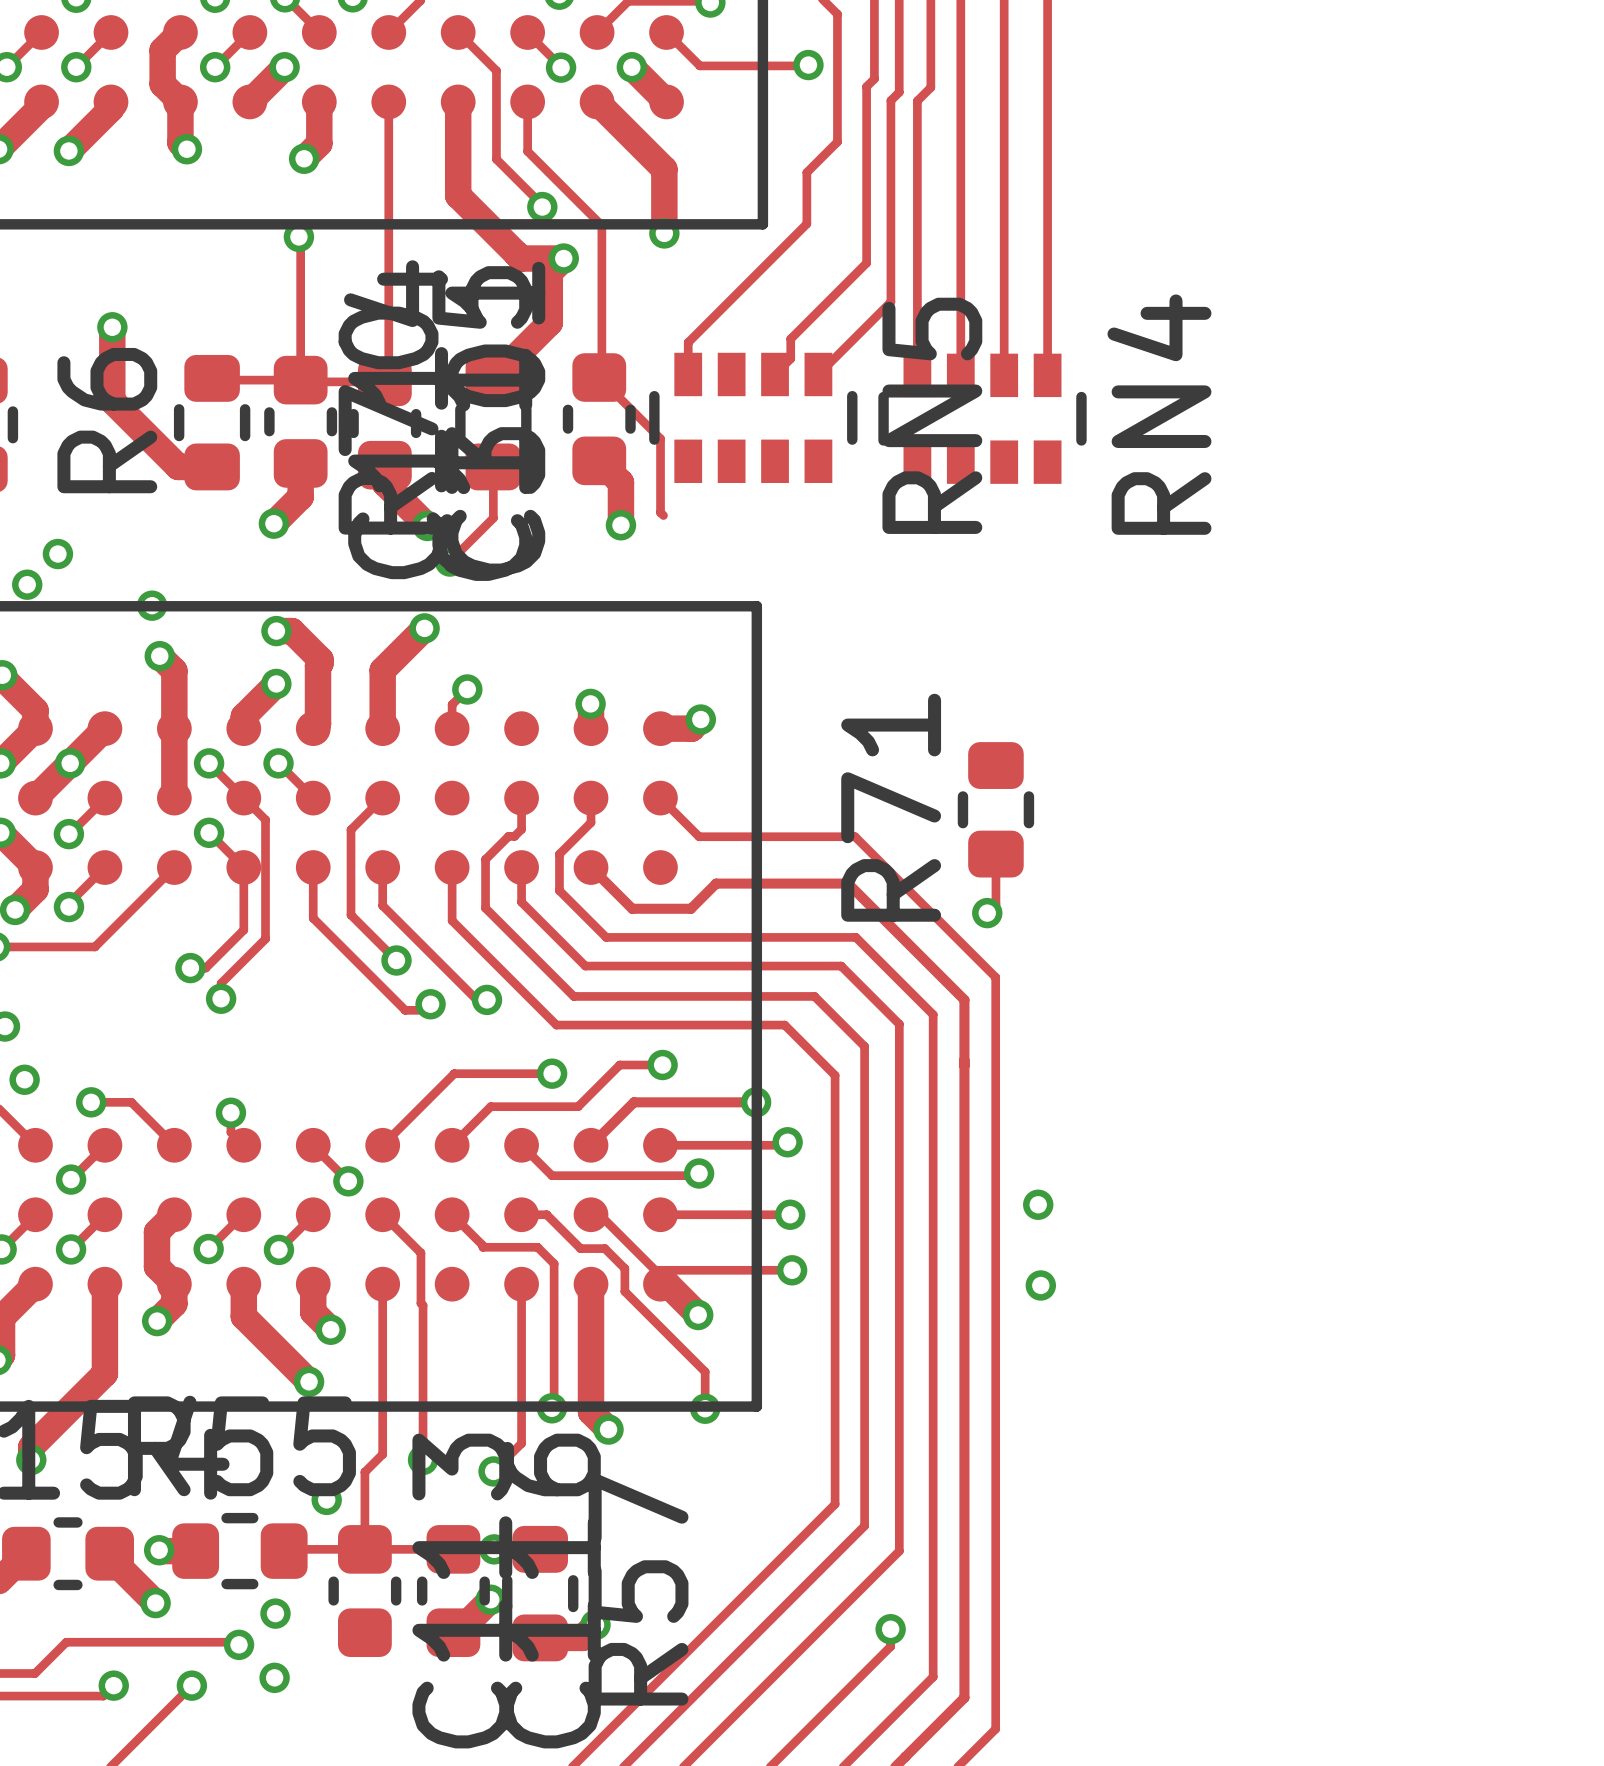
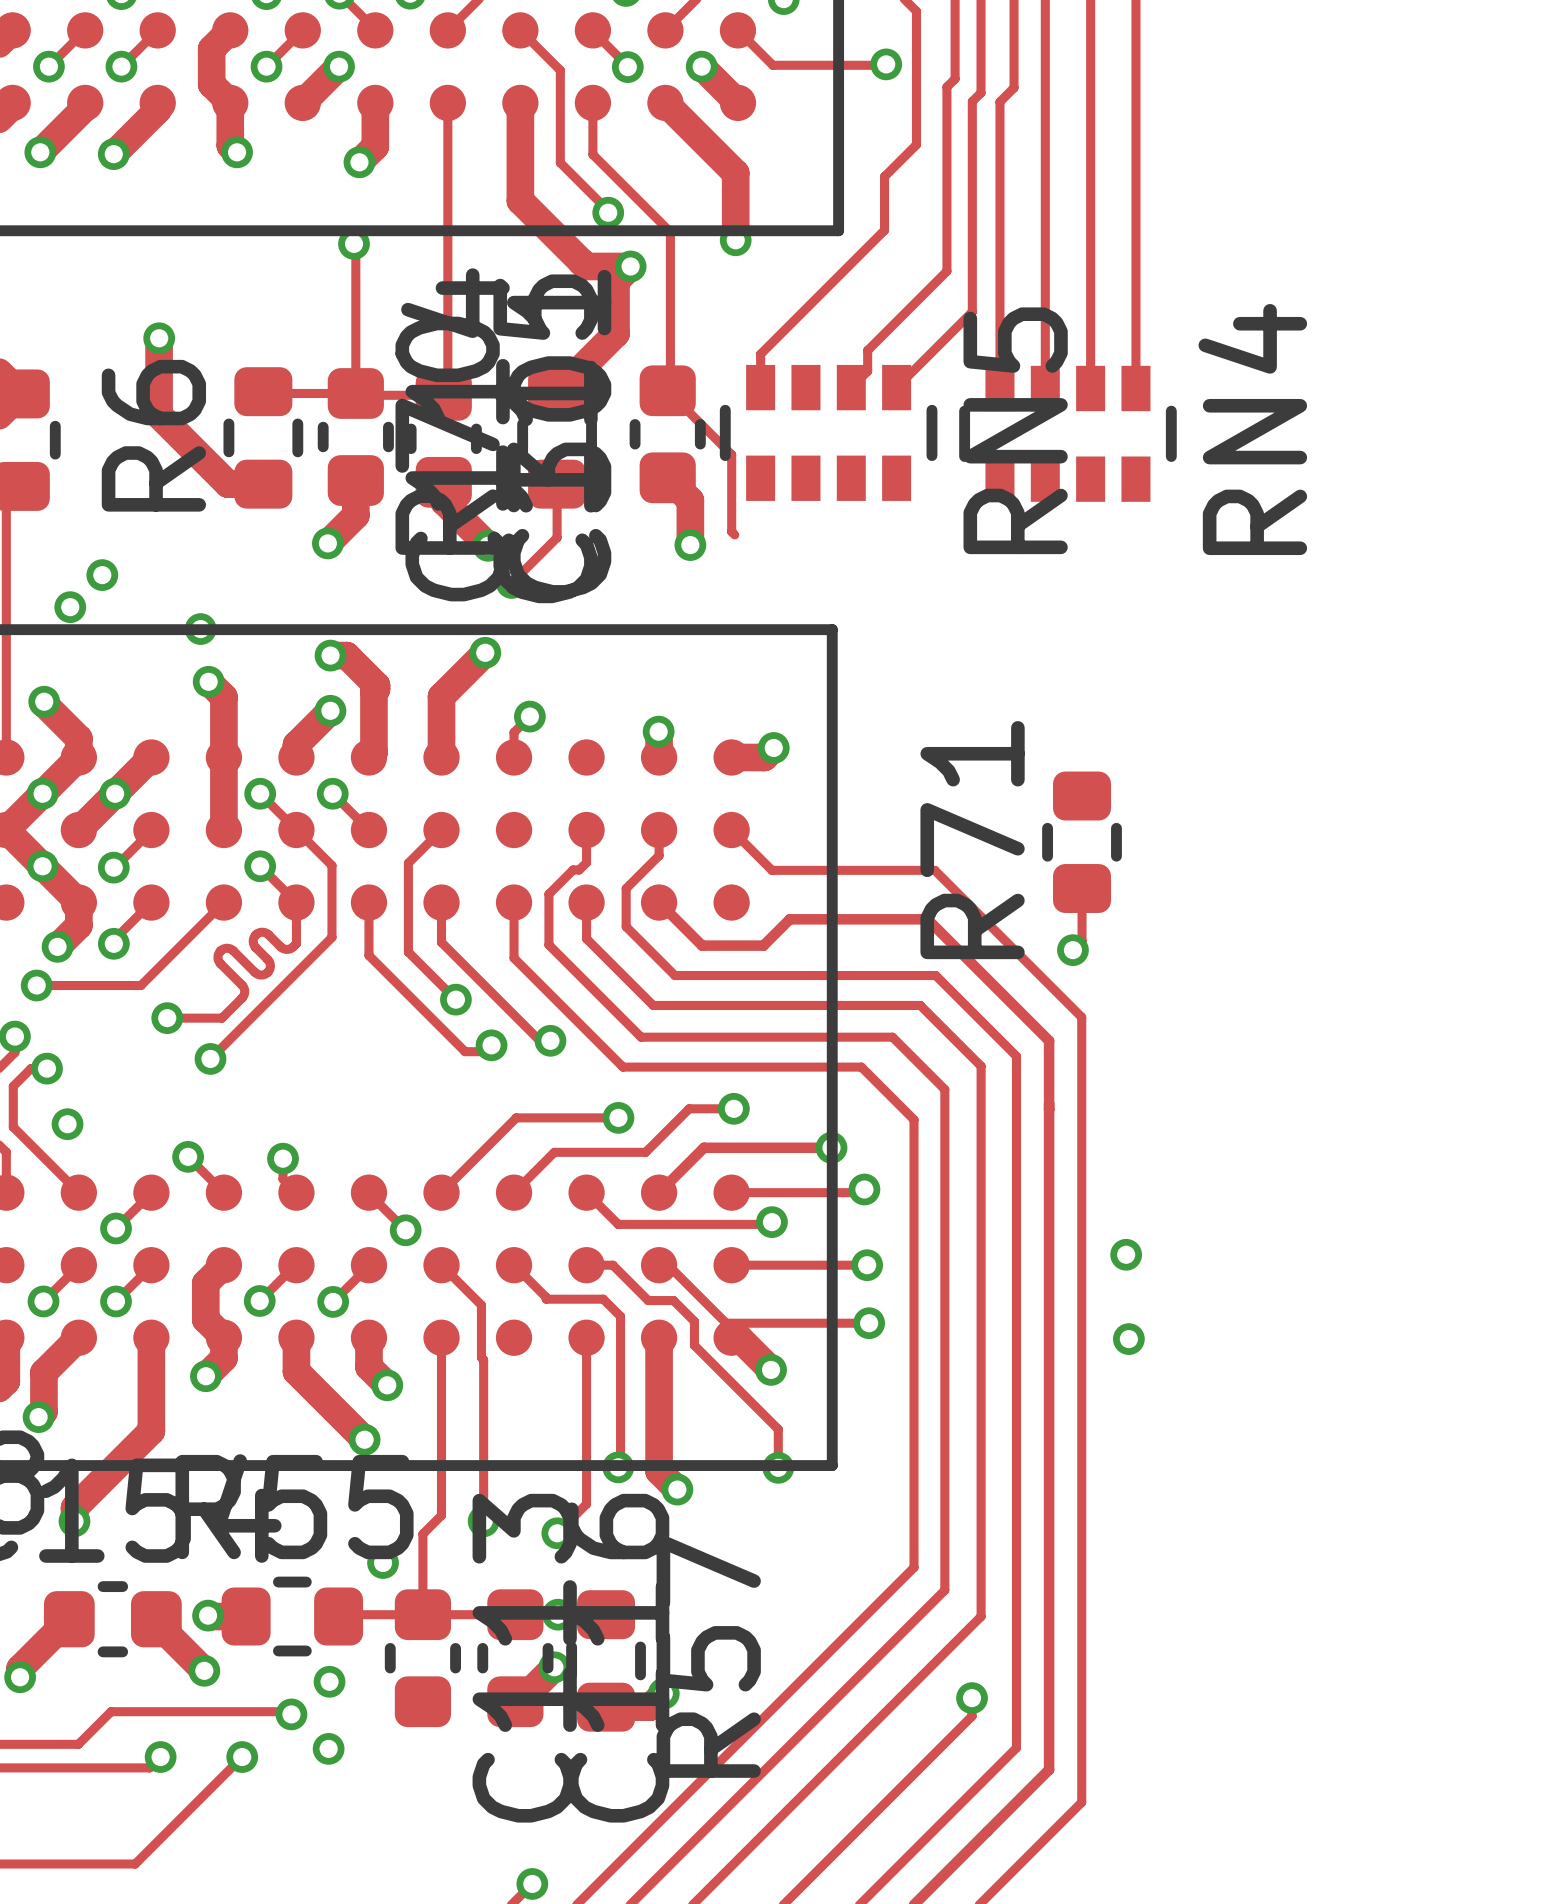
track: (265, 819) (265, 939) (221, 983) (221, 998) -> (319, 852) (331, 865) (331, 937) (210, 1058)
track: (243, 906) (243, 930) (205, 968) (190, 968) -> (296, 943) (290, 948) (284, 949) (266, 933) (260, 932) (255, 934) (253, 938) (253, 944) (270, 964) (268, 971) (262, 974) (255, 973) (231, 949) (222, 949) (218, 954) (218, 960) (243, 987) (244, 992) (242, 997) (221, 1018) (167, 1018)
via: (190, 968) -> none
via: none -> (167, 1018)
via: (221, 998) -> none
via: none -> (210, 1058)
track: (91, 1102) (131, 1102) (140, 1111) -> none
via position: (91, 1102) -> (188, 1156)

